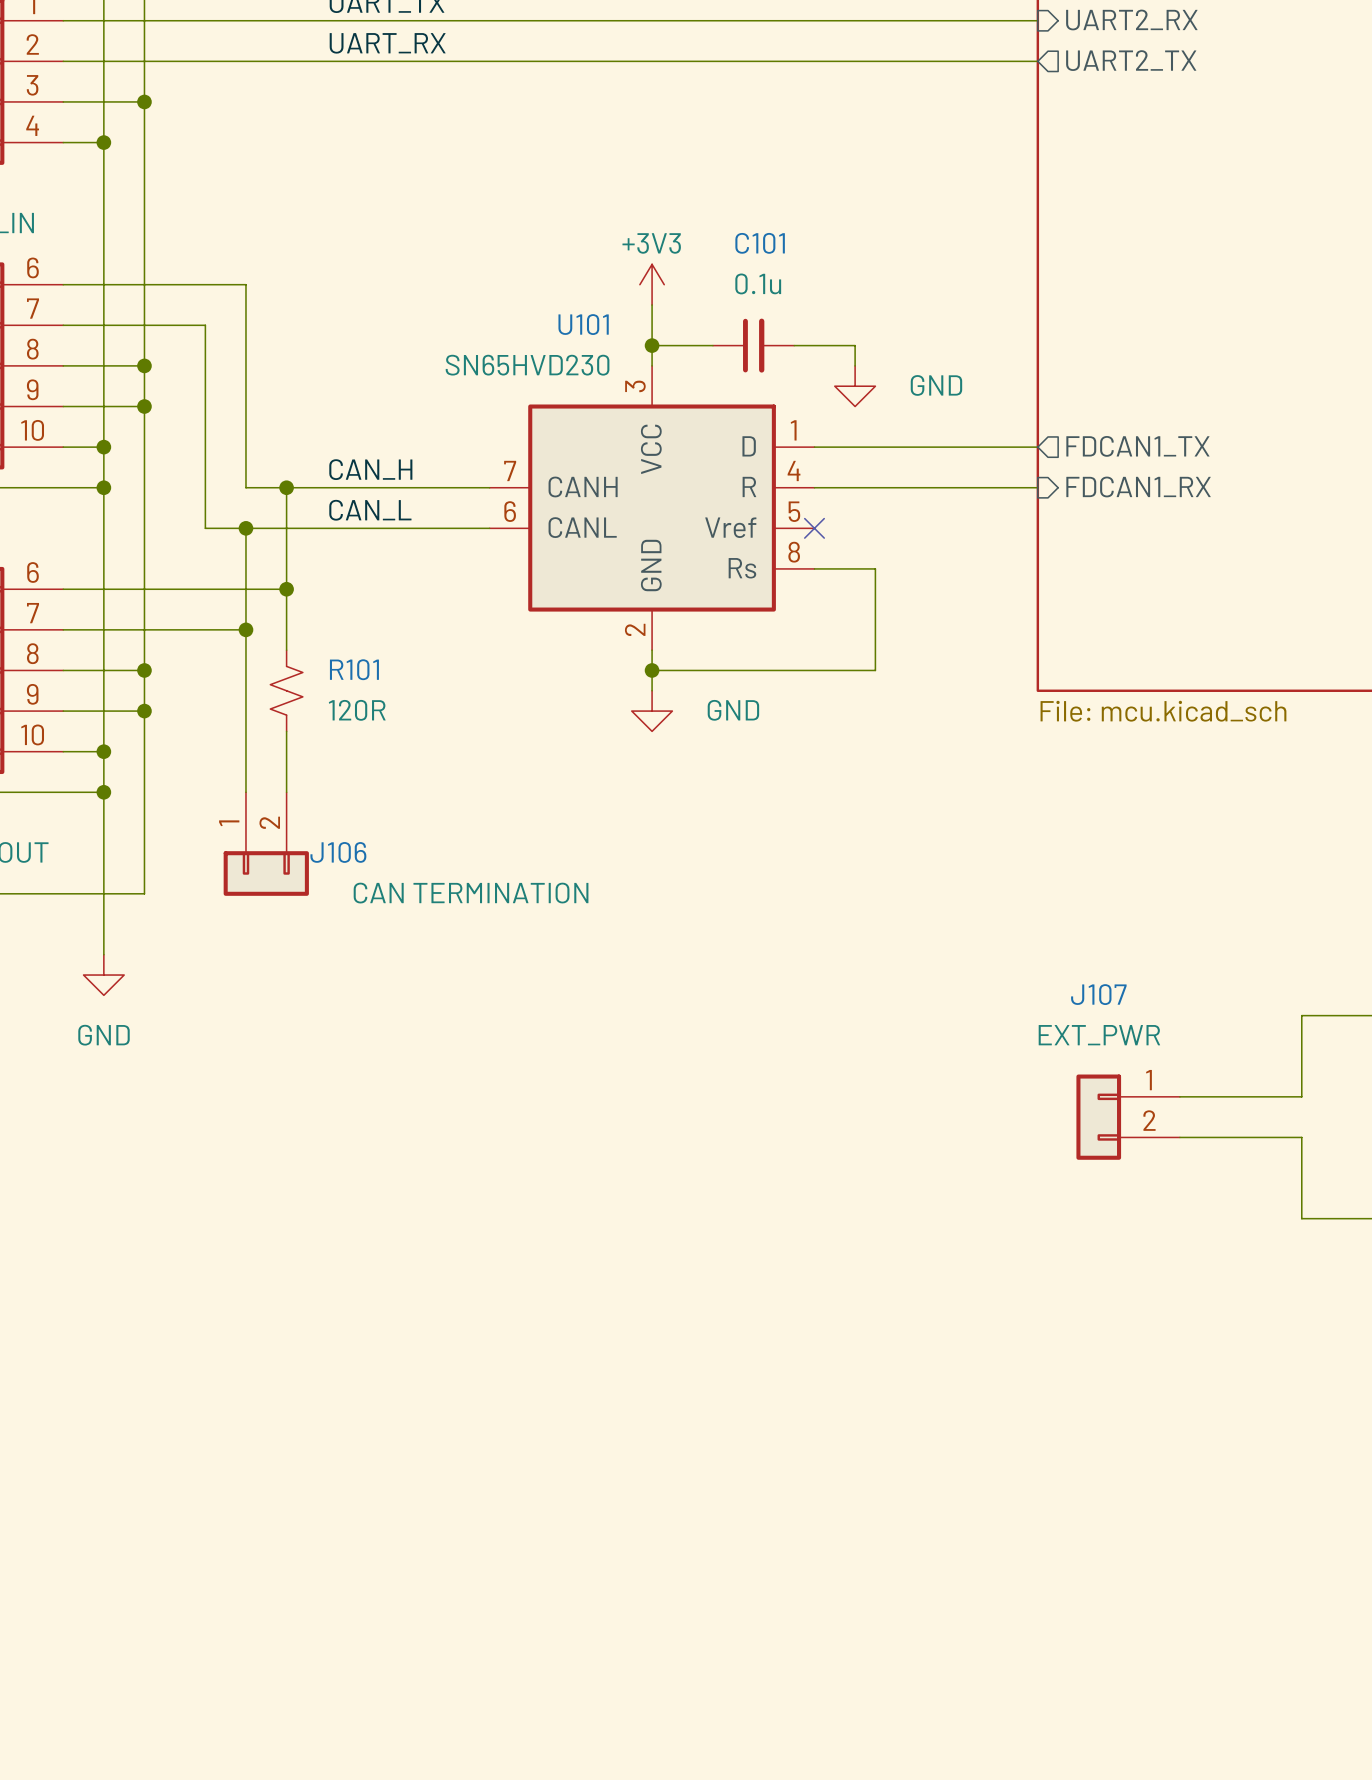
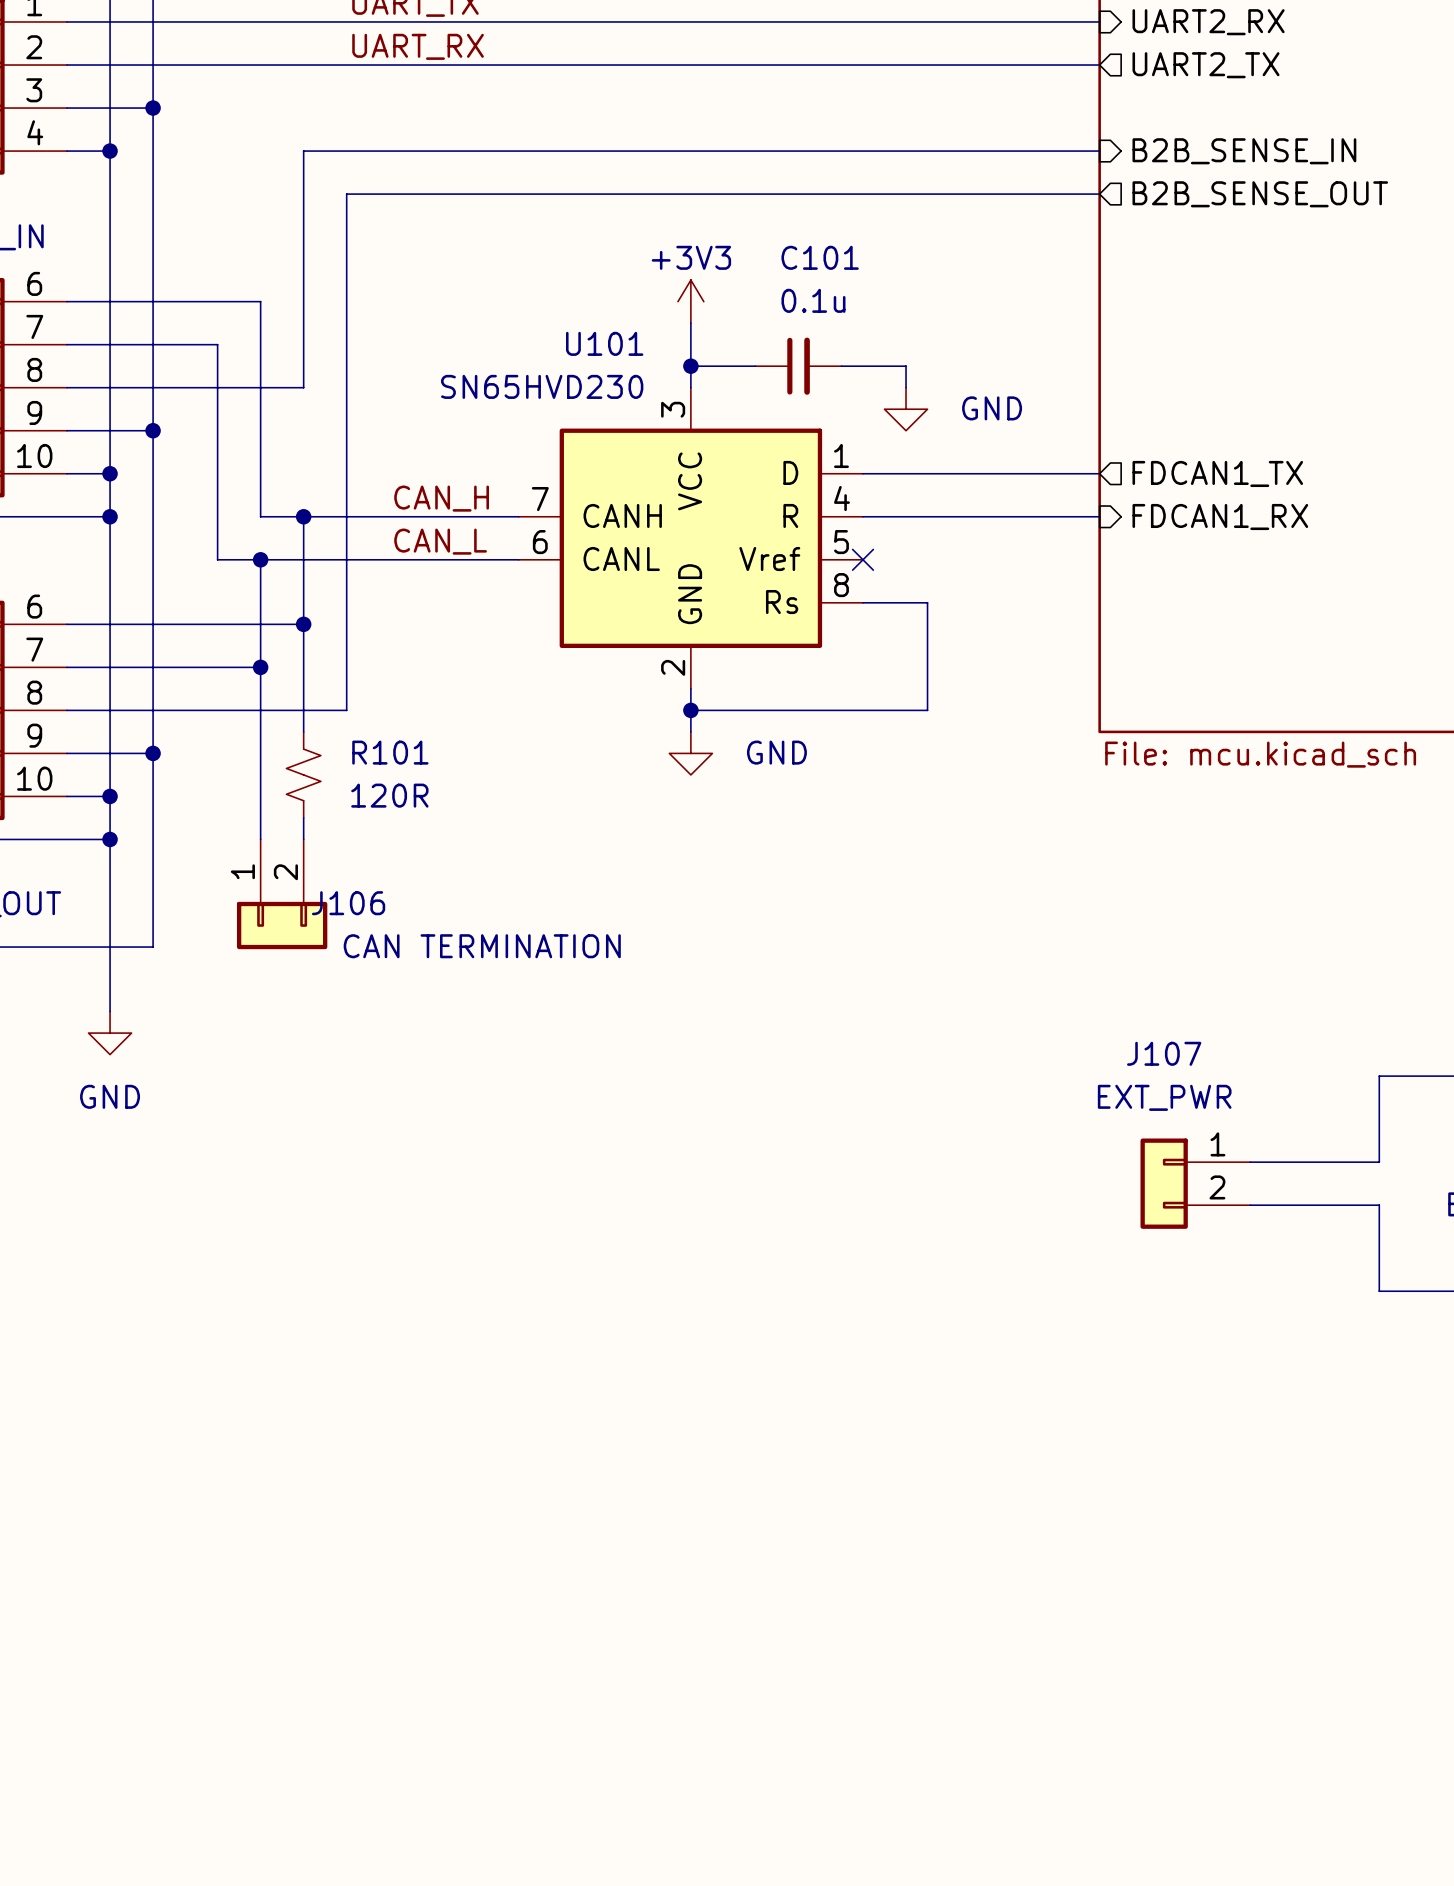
sheet pin: none -> B2B_SENSE_IN (1244, 151)
wire: none -> (1099, 151) (303, 151) (303, 387) (153, 387)
sheet pin: none -> B2B_SENSE_OUT (1260, 194)
wire: none -> (1099, 194) (346, 194) (346, 710) (153, 710)
junction: (144, 365) -> none
label position: CAN_H (370, 469) -> CAN_H (441, 498)
label position: CAN_L (370, 510) -> CAN_L (440, 541)
junction: (144, 670) -> none
R101 position: (286, 690) -> (303, 774)
wire: (286, 731) (286, 771) -> (303, 688) (303, 731)

